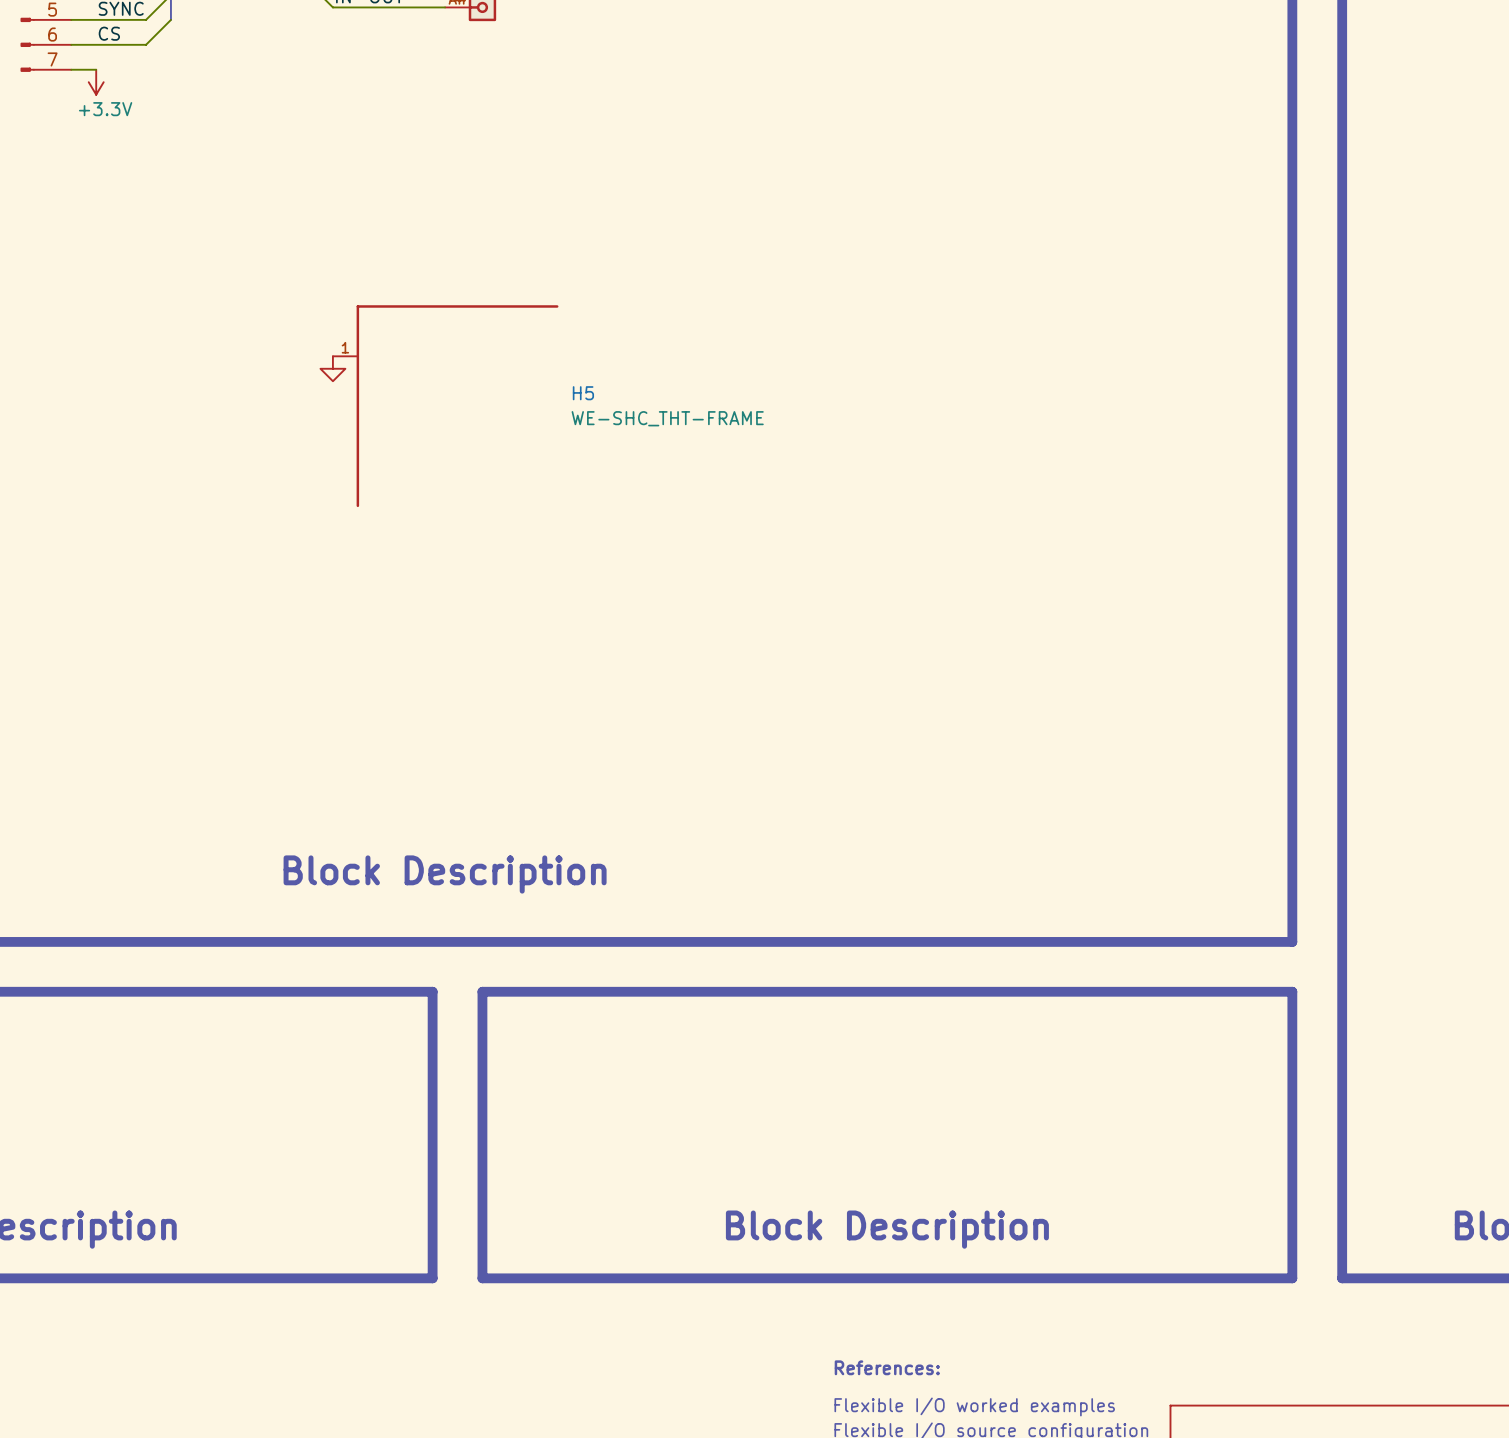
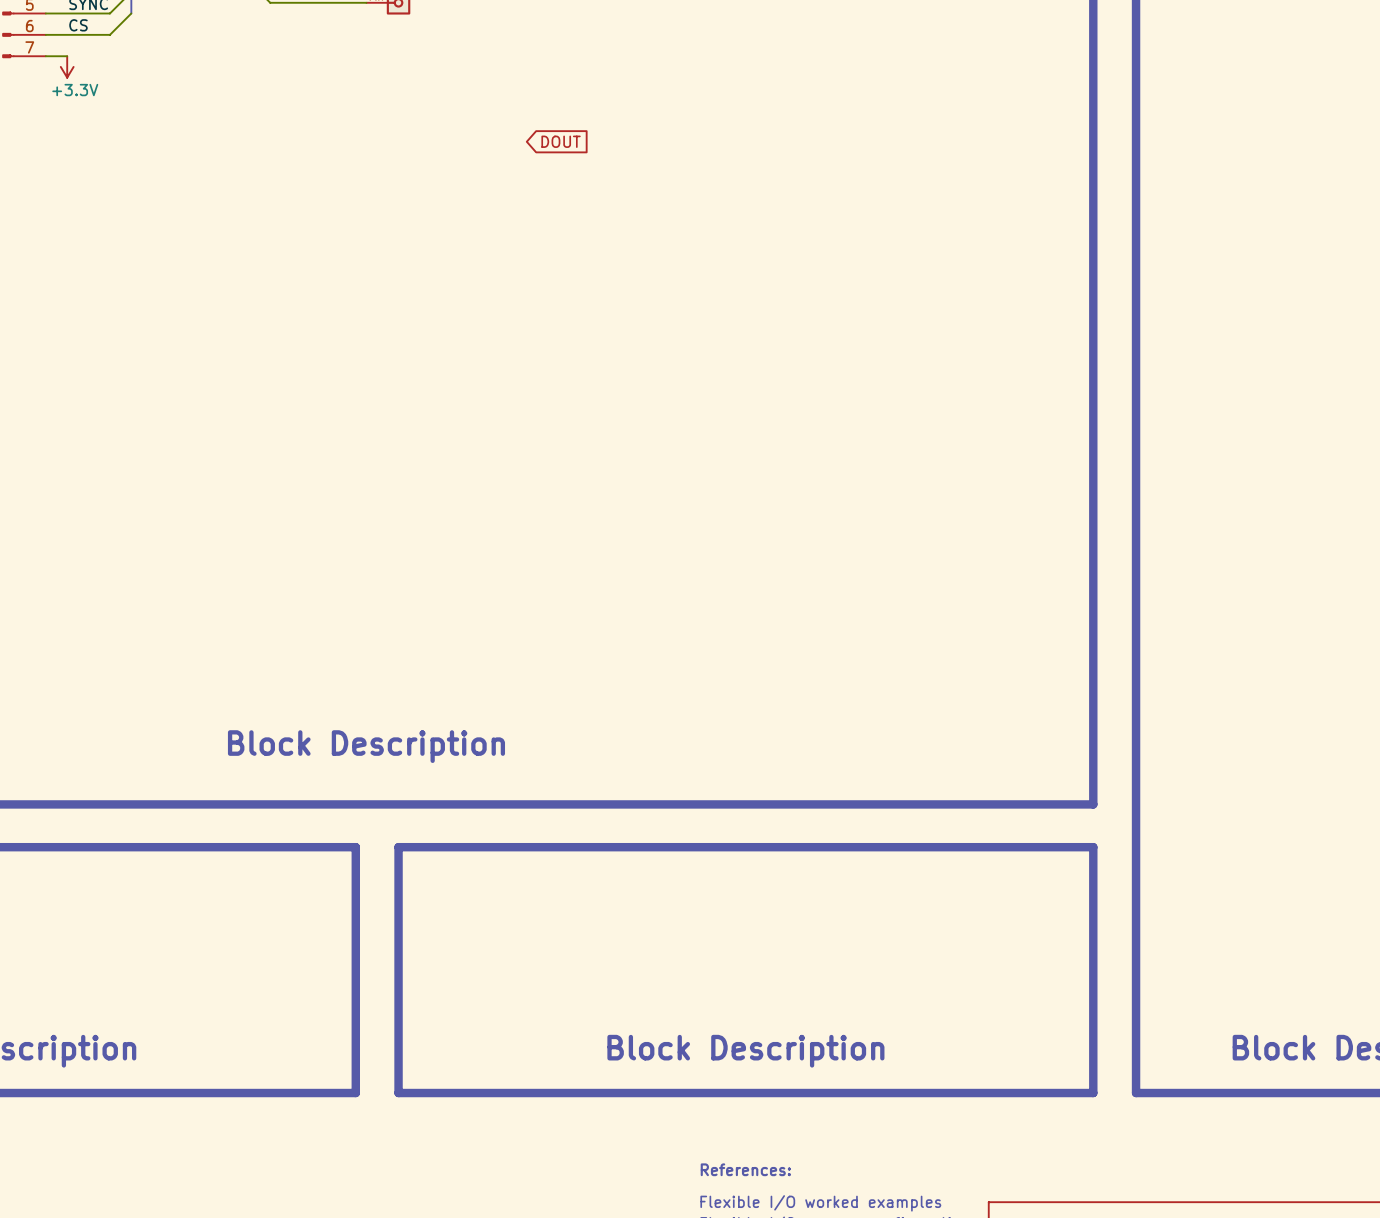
global label: none -> DOUT (561, 141)
power symbol: (332, 368) -> none
H5: WE-SHC_THT-FRAME (445, 406) -> none

